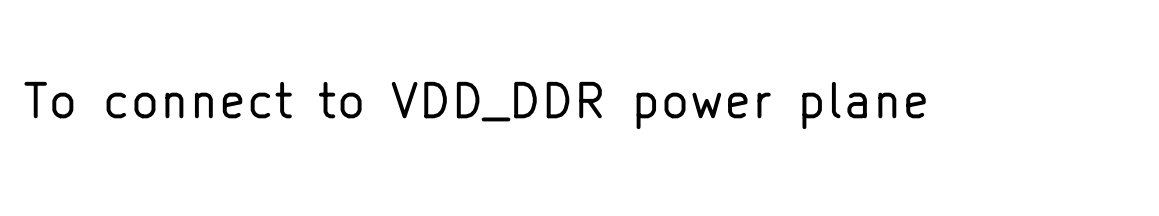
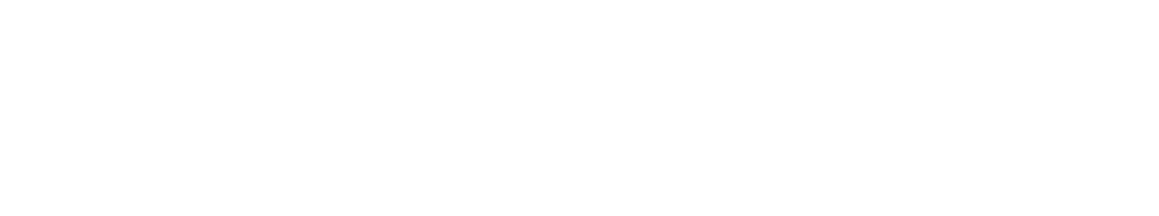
text: To connect to VDD_DDR power plane (475, 105) -> none

